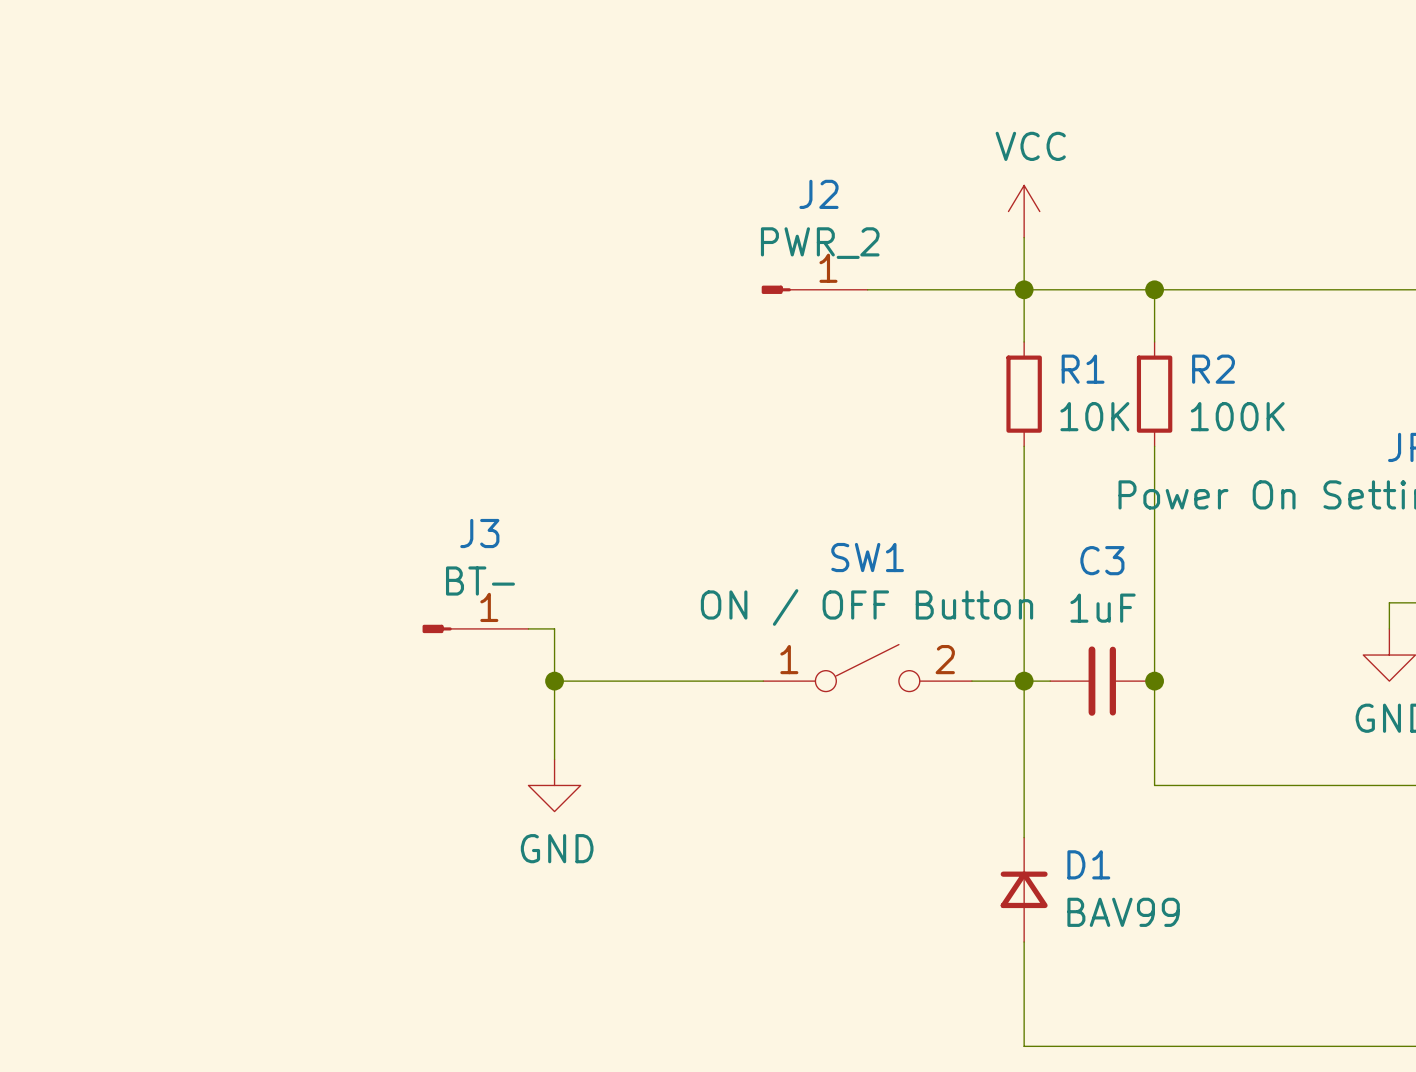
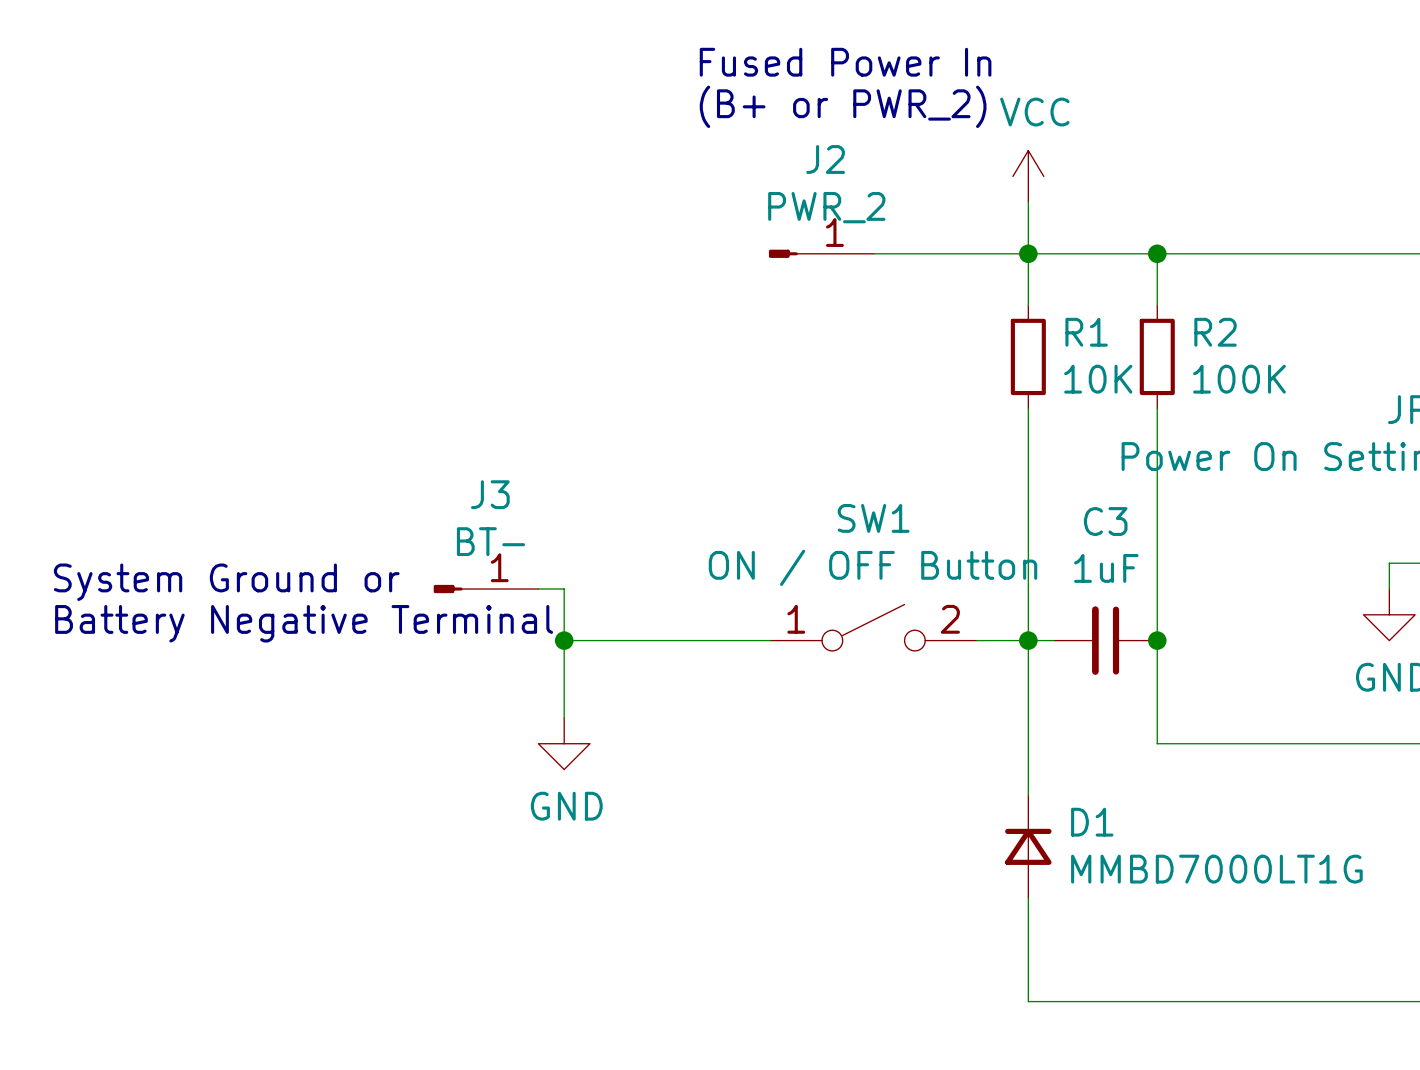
text: none -> Fused Power In (845, 62)
text: none -> (B+ or PWR_2) (843, 106)
text: none -> System Ground or (226, 582)
text: none -> Battery Negative Terminal (304, 623)
D1 value: BAV99 (1123, 912) -> MMBD7000LT1G (1216, 869)

